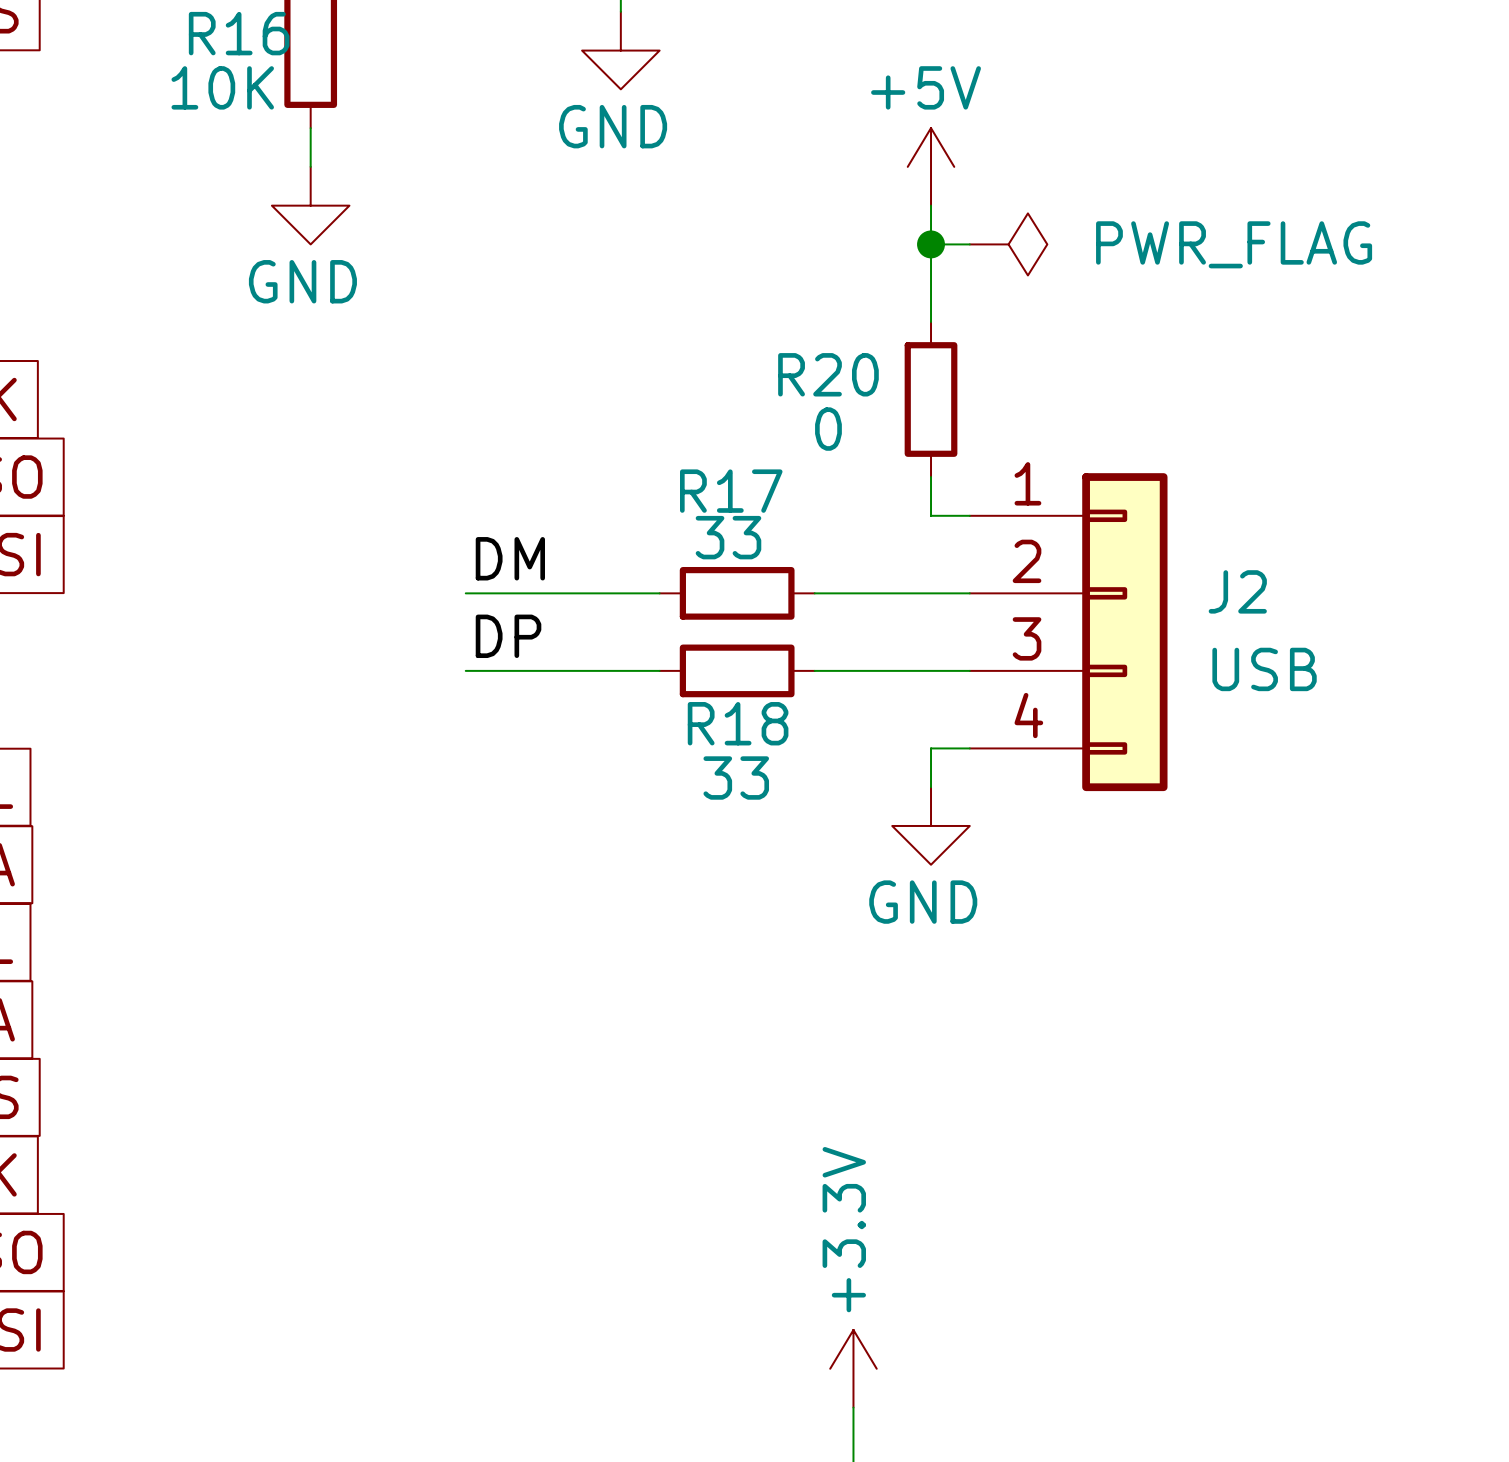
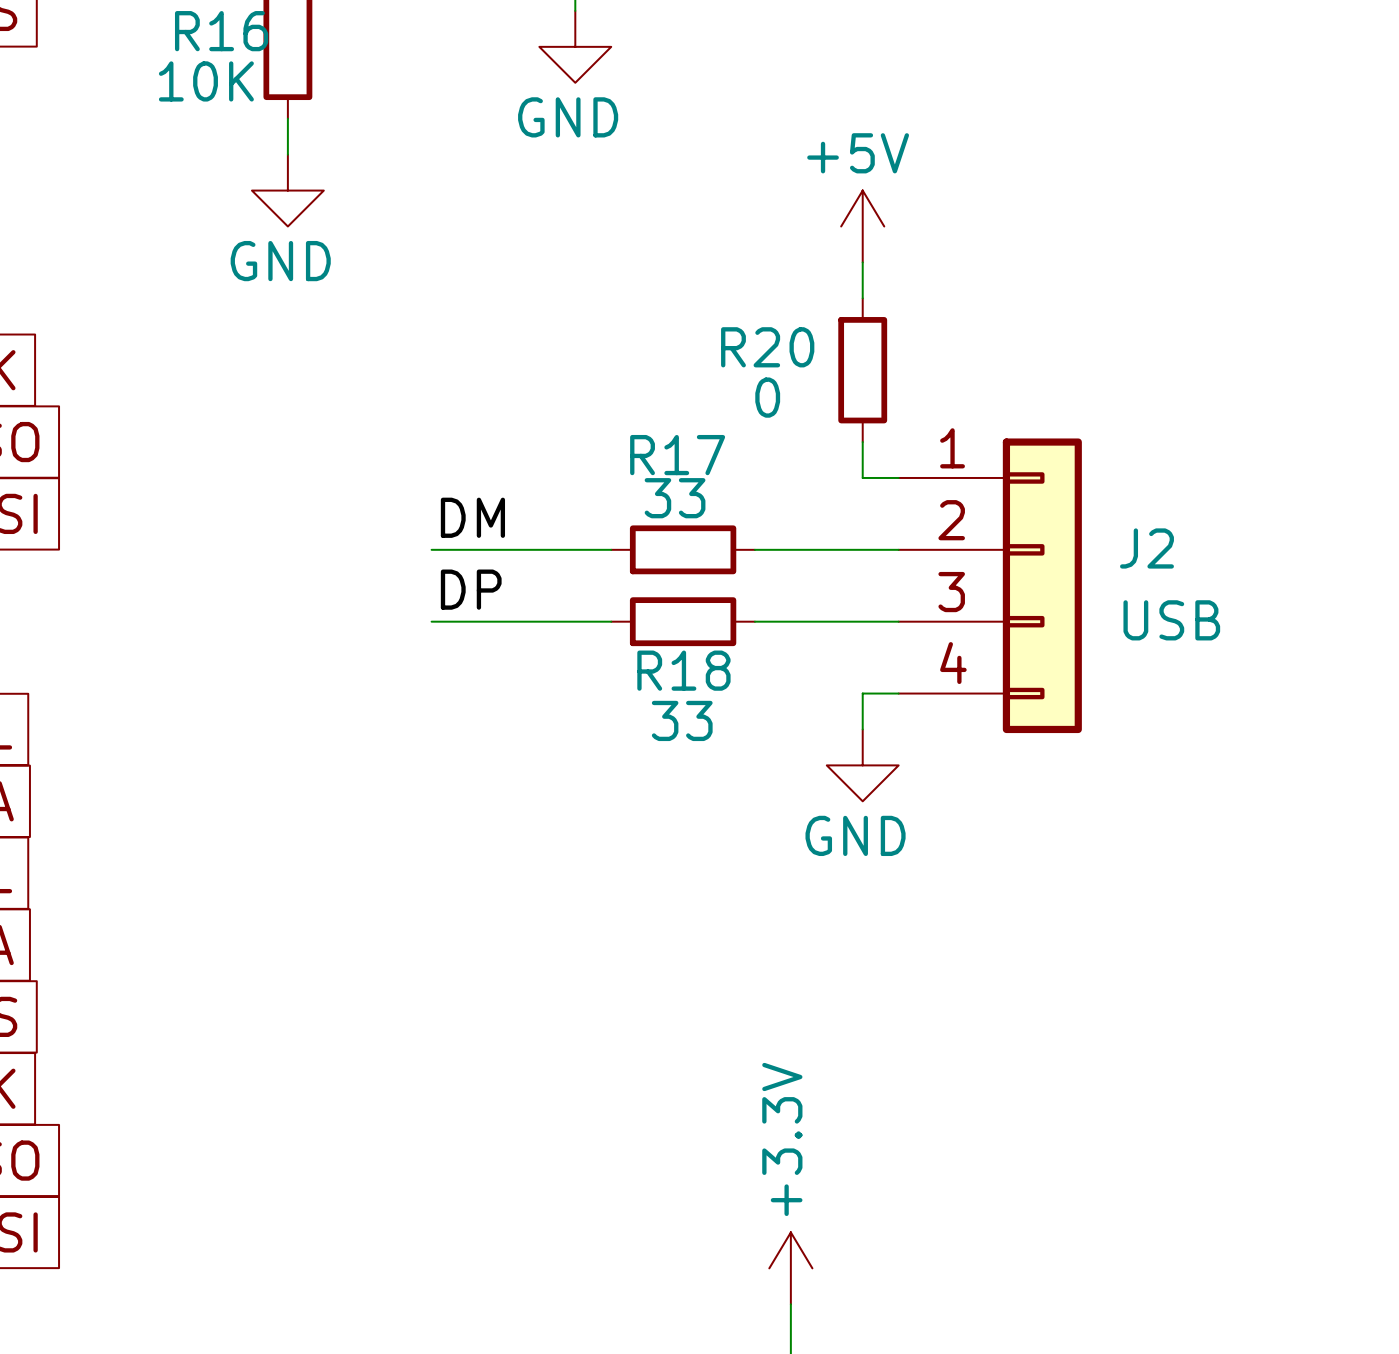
power symbol position: +5V (931, 166) -> +5V (862, 226)
wire: (931, 244) (969, 244) -> none
junction: (931, 244) -> none
power symbol: PWR_FLAG (1008, 244) -> none

